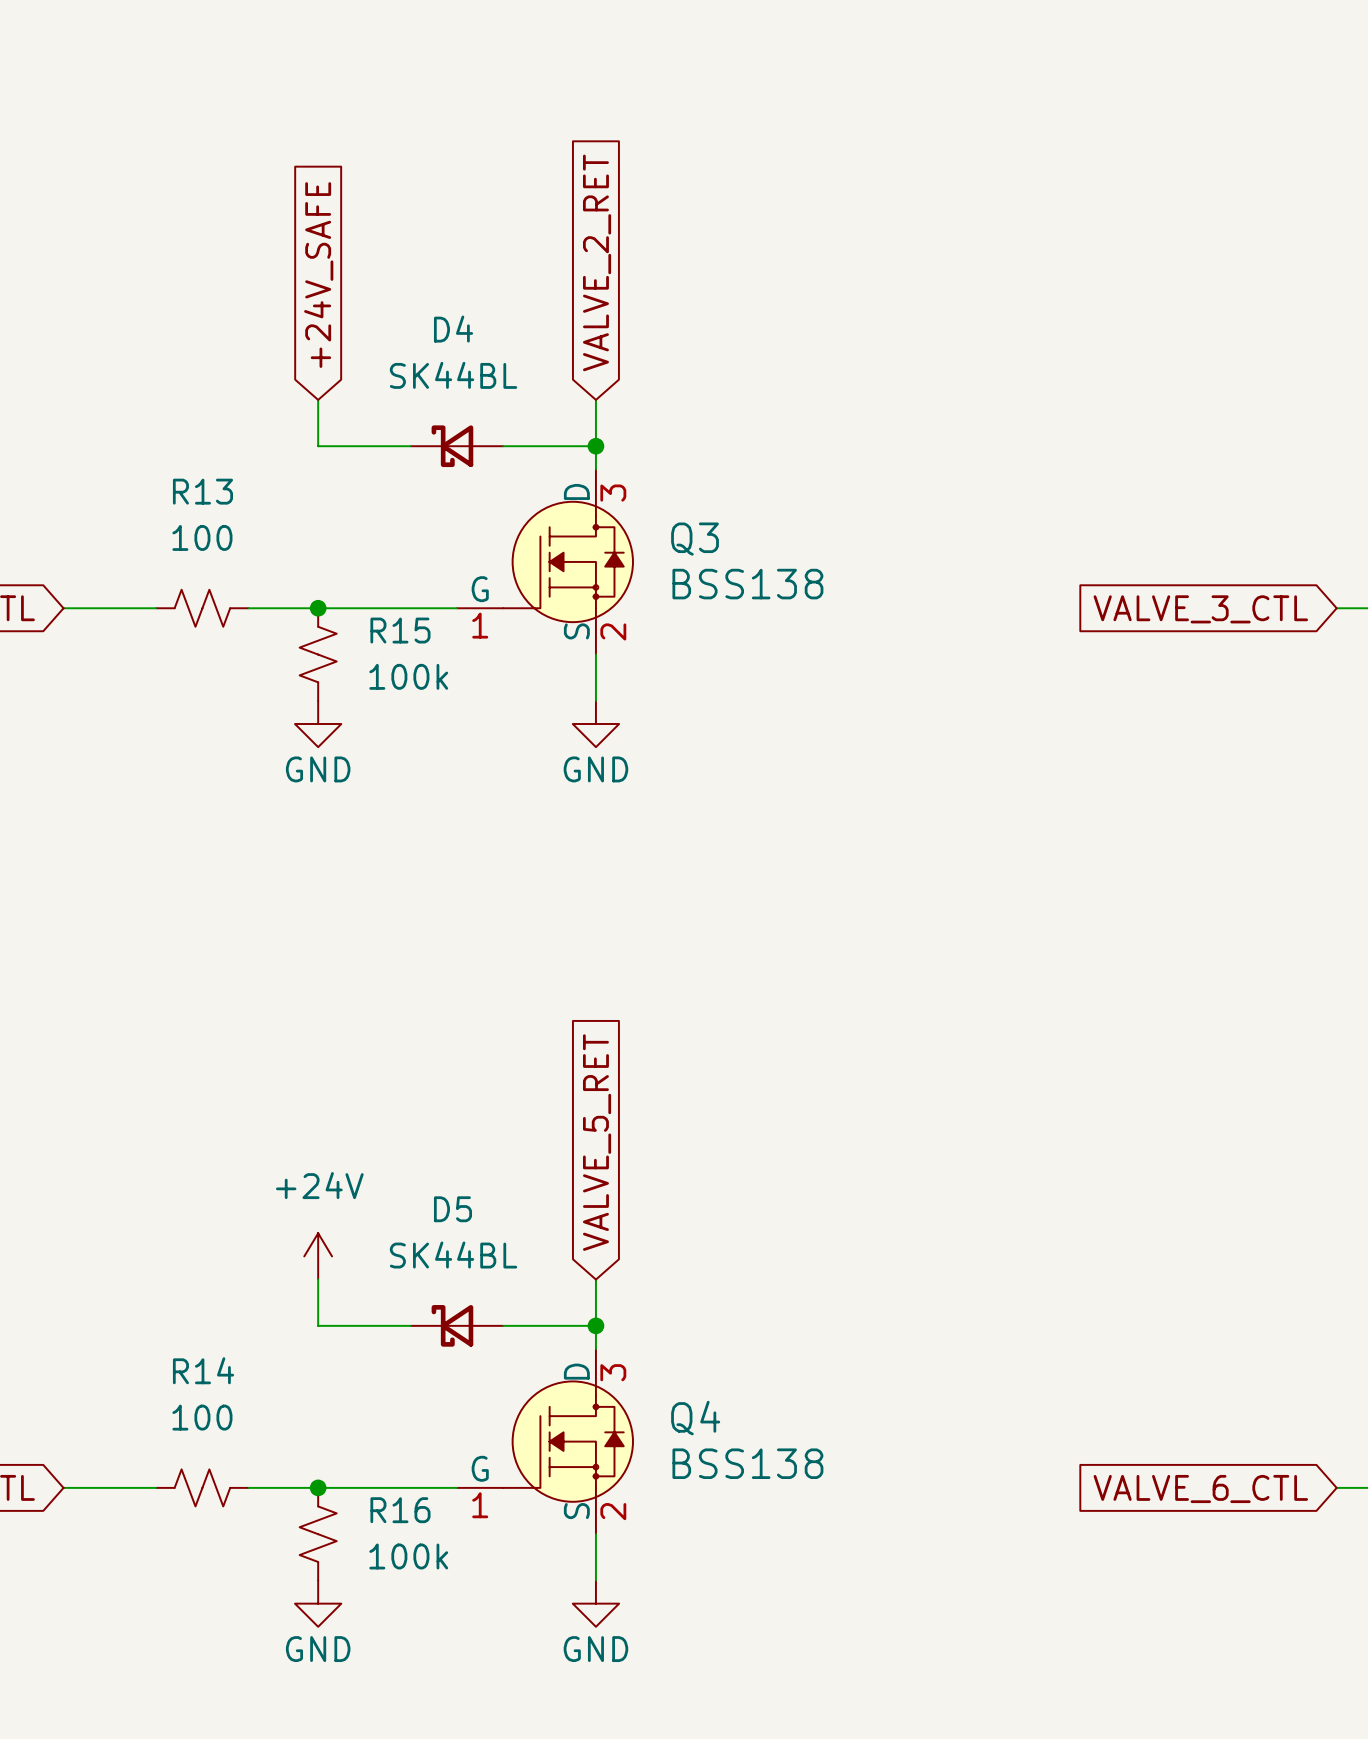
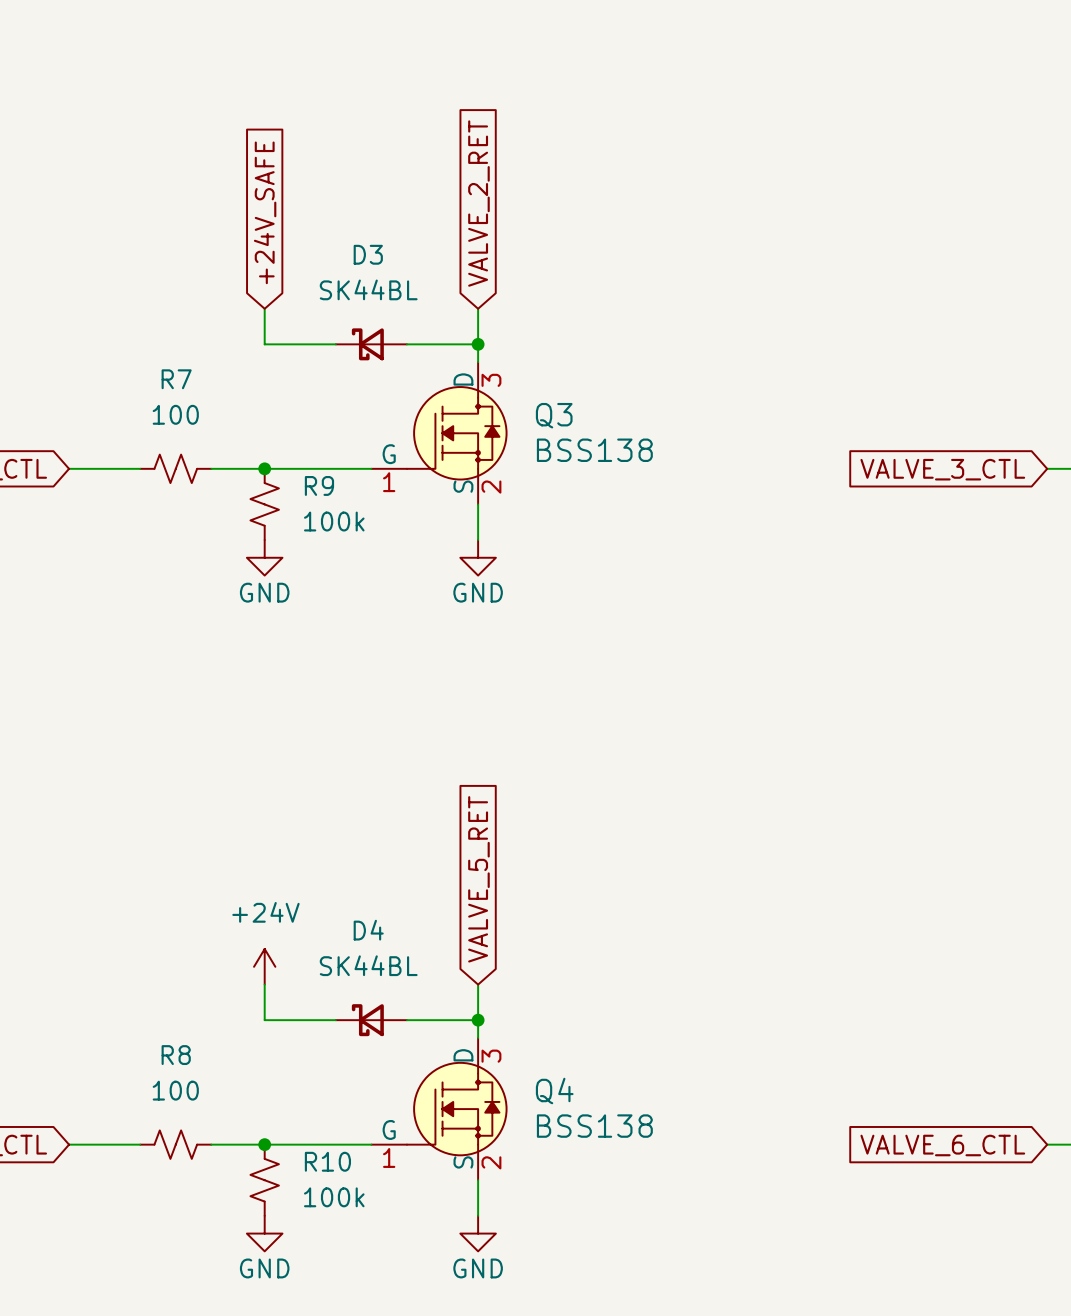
D4 name: D4 (453, 329) -> D3 (368, 254)
R13 name: R13 (202, 491) -> R7 (176, 379)
R15 name: R15 (400, 630) -> R9 (319, 485)
D5 name: D5 (452, 1209) -> D4 (368, 930)
R14 name: R14 (203, 1370) -> R8 (176, 1055)
R16 name: R16 (400, 1510) -> R10 (327, 1161)

